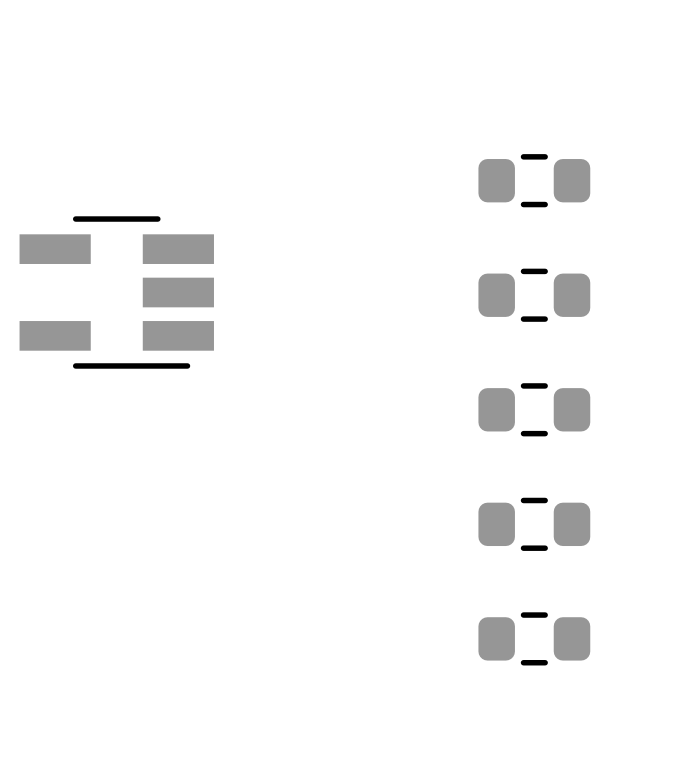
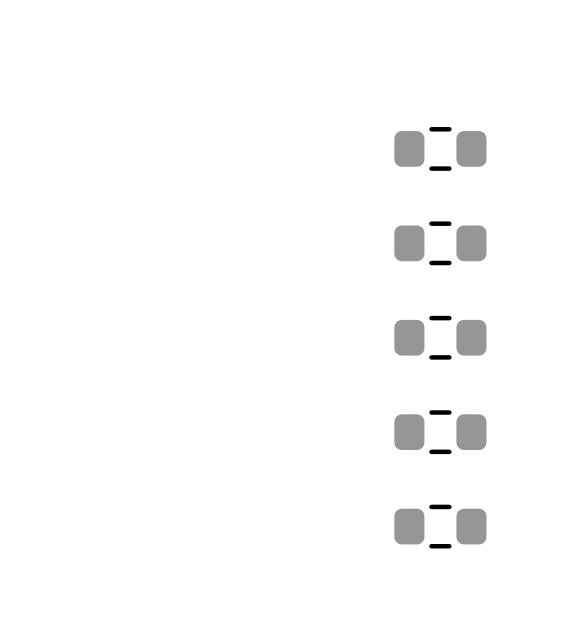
part: (116, 292) -> none

